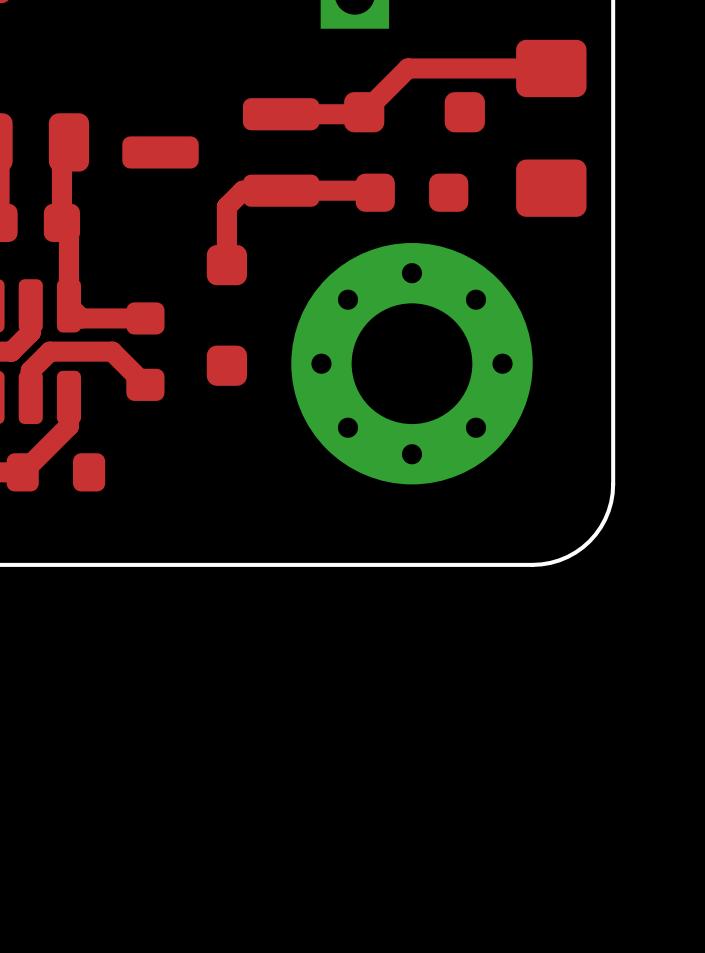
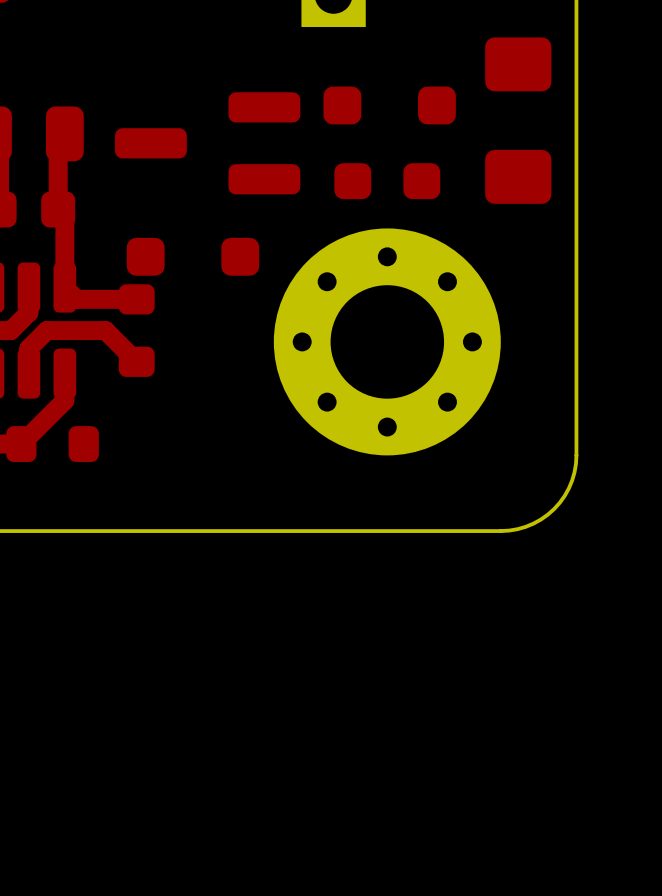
top track: (551, 68) (407, 68) (362, 114) (281, 114) -> none
top track: (375, 192) (373, 190) (242, 190) (226, 206) (226, 265) -> none
part rotation: 0° (226, 315) -> 90° clockwise (192, 256)

